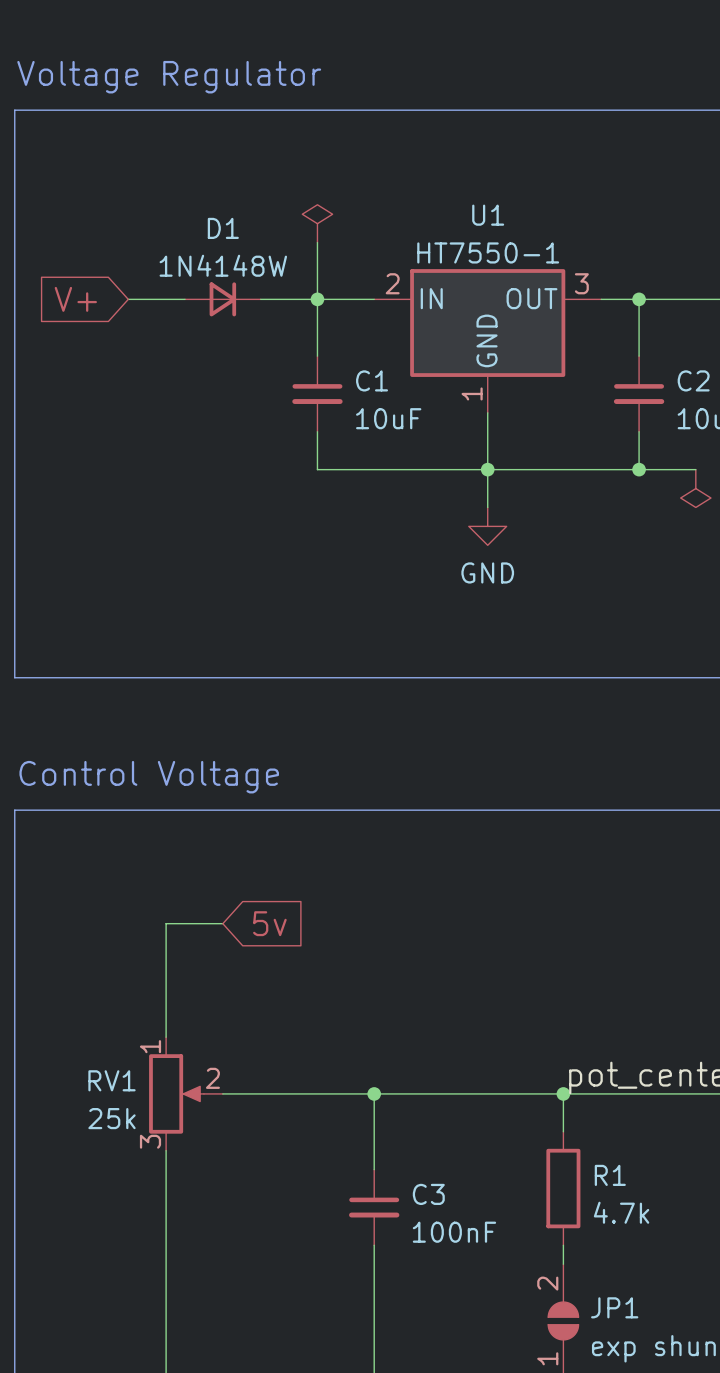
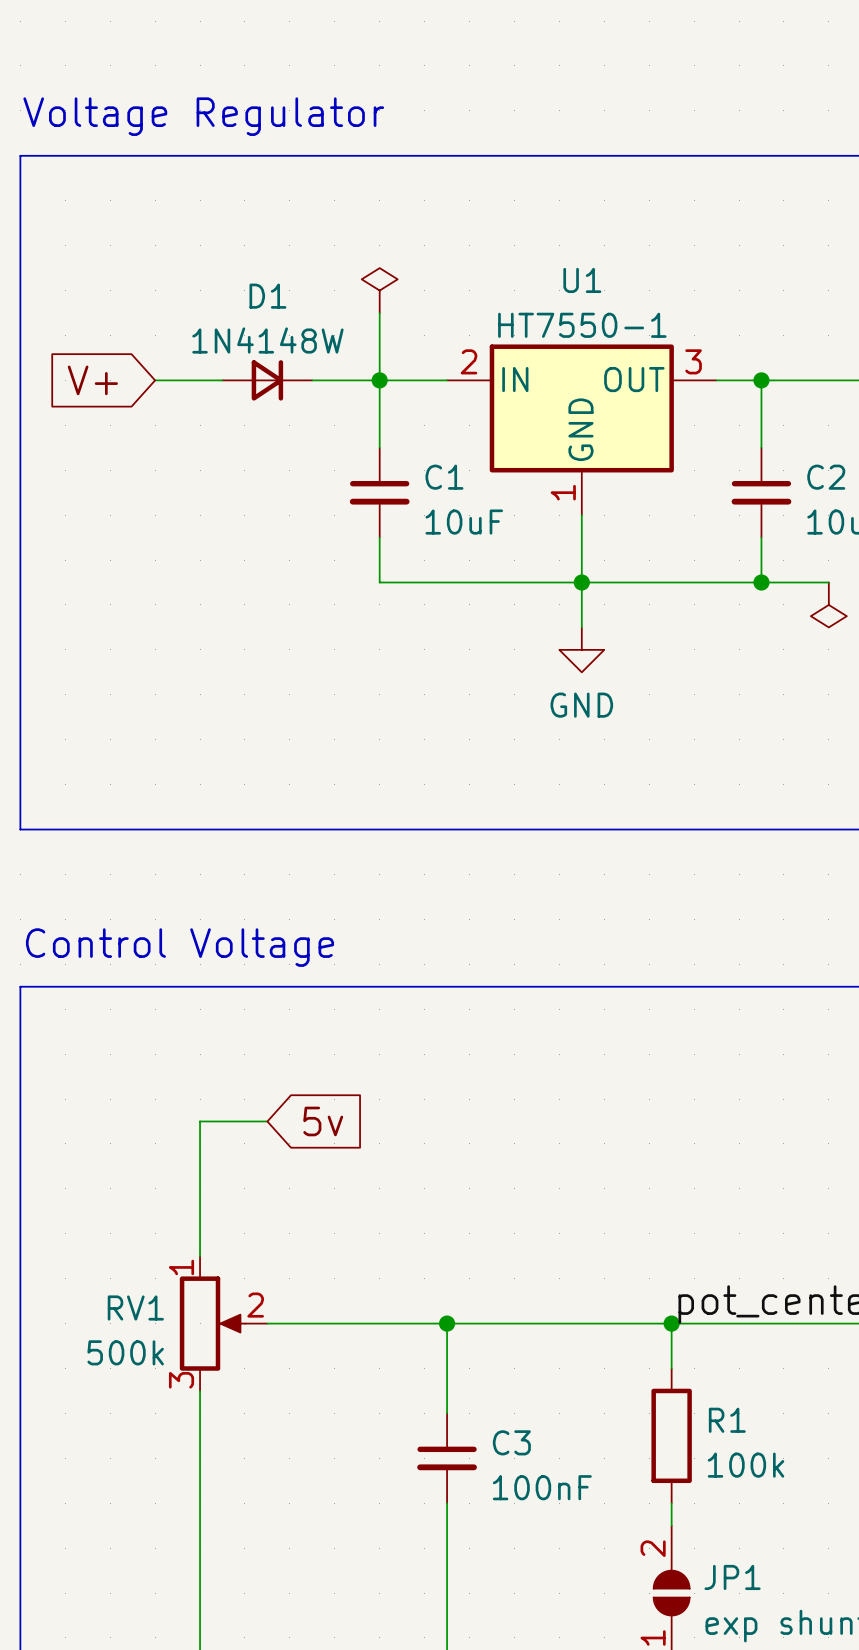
RV1 value: 25k (112, 1118) -> 500k (125, 1352)
R1 value: 4.7k (621, 1212) -> 100k (746, 1465)

